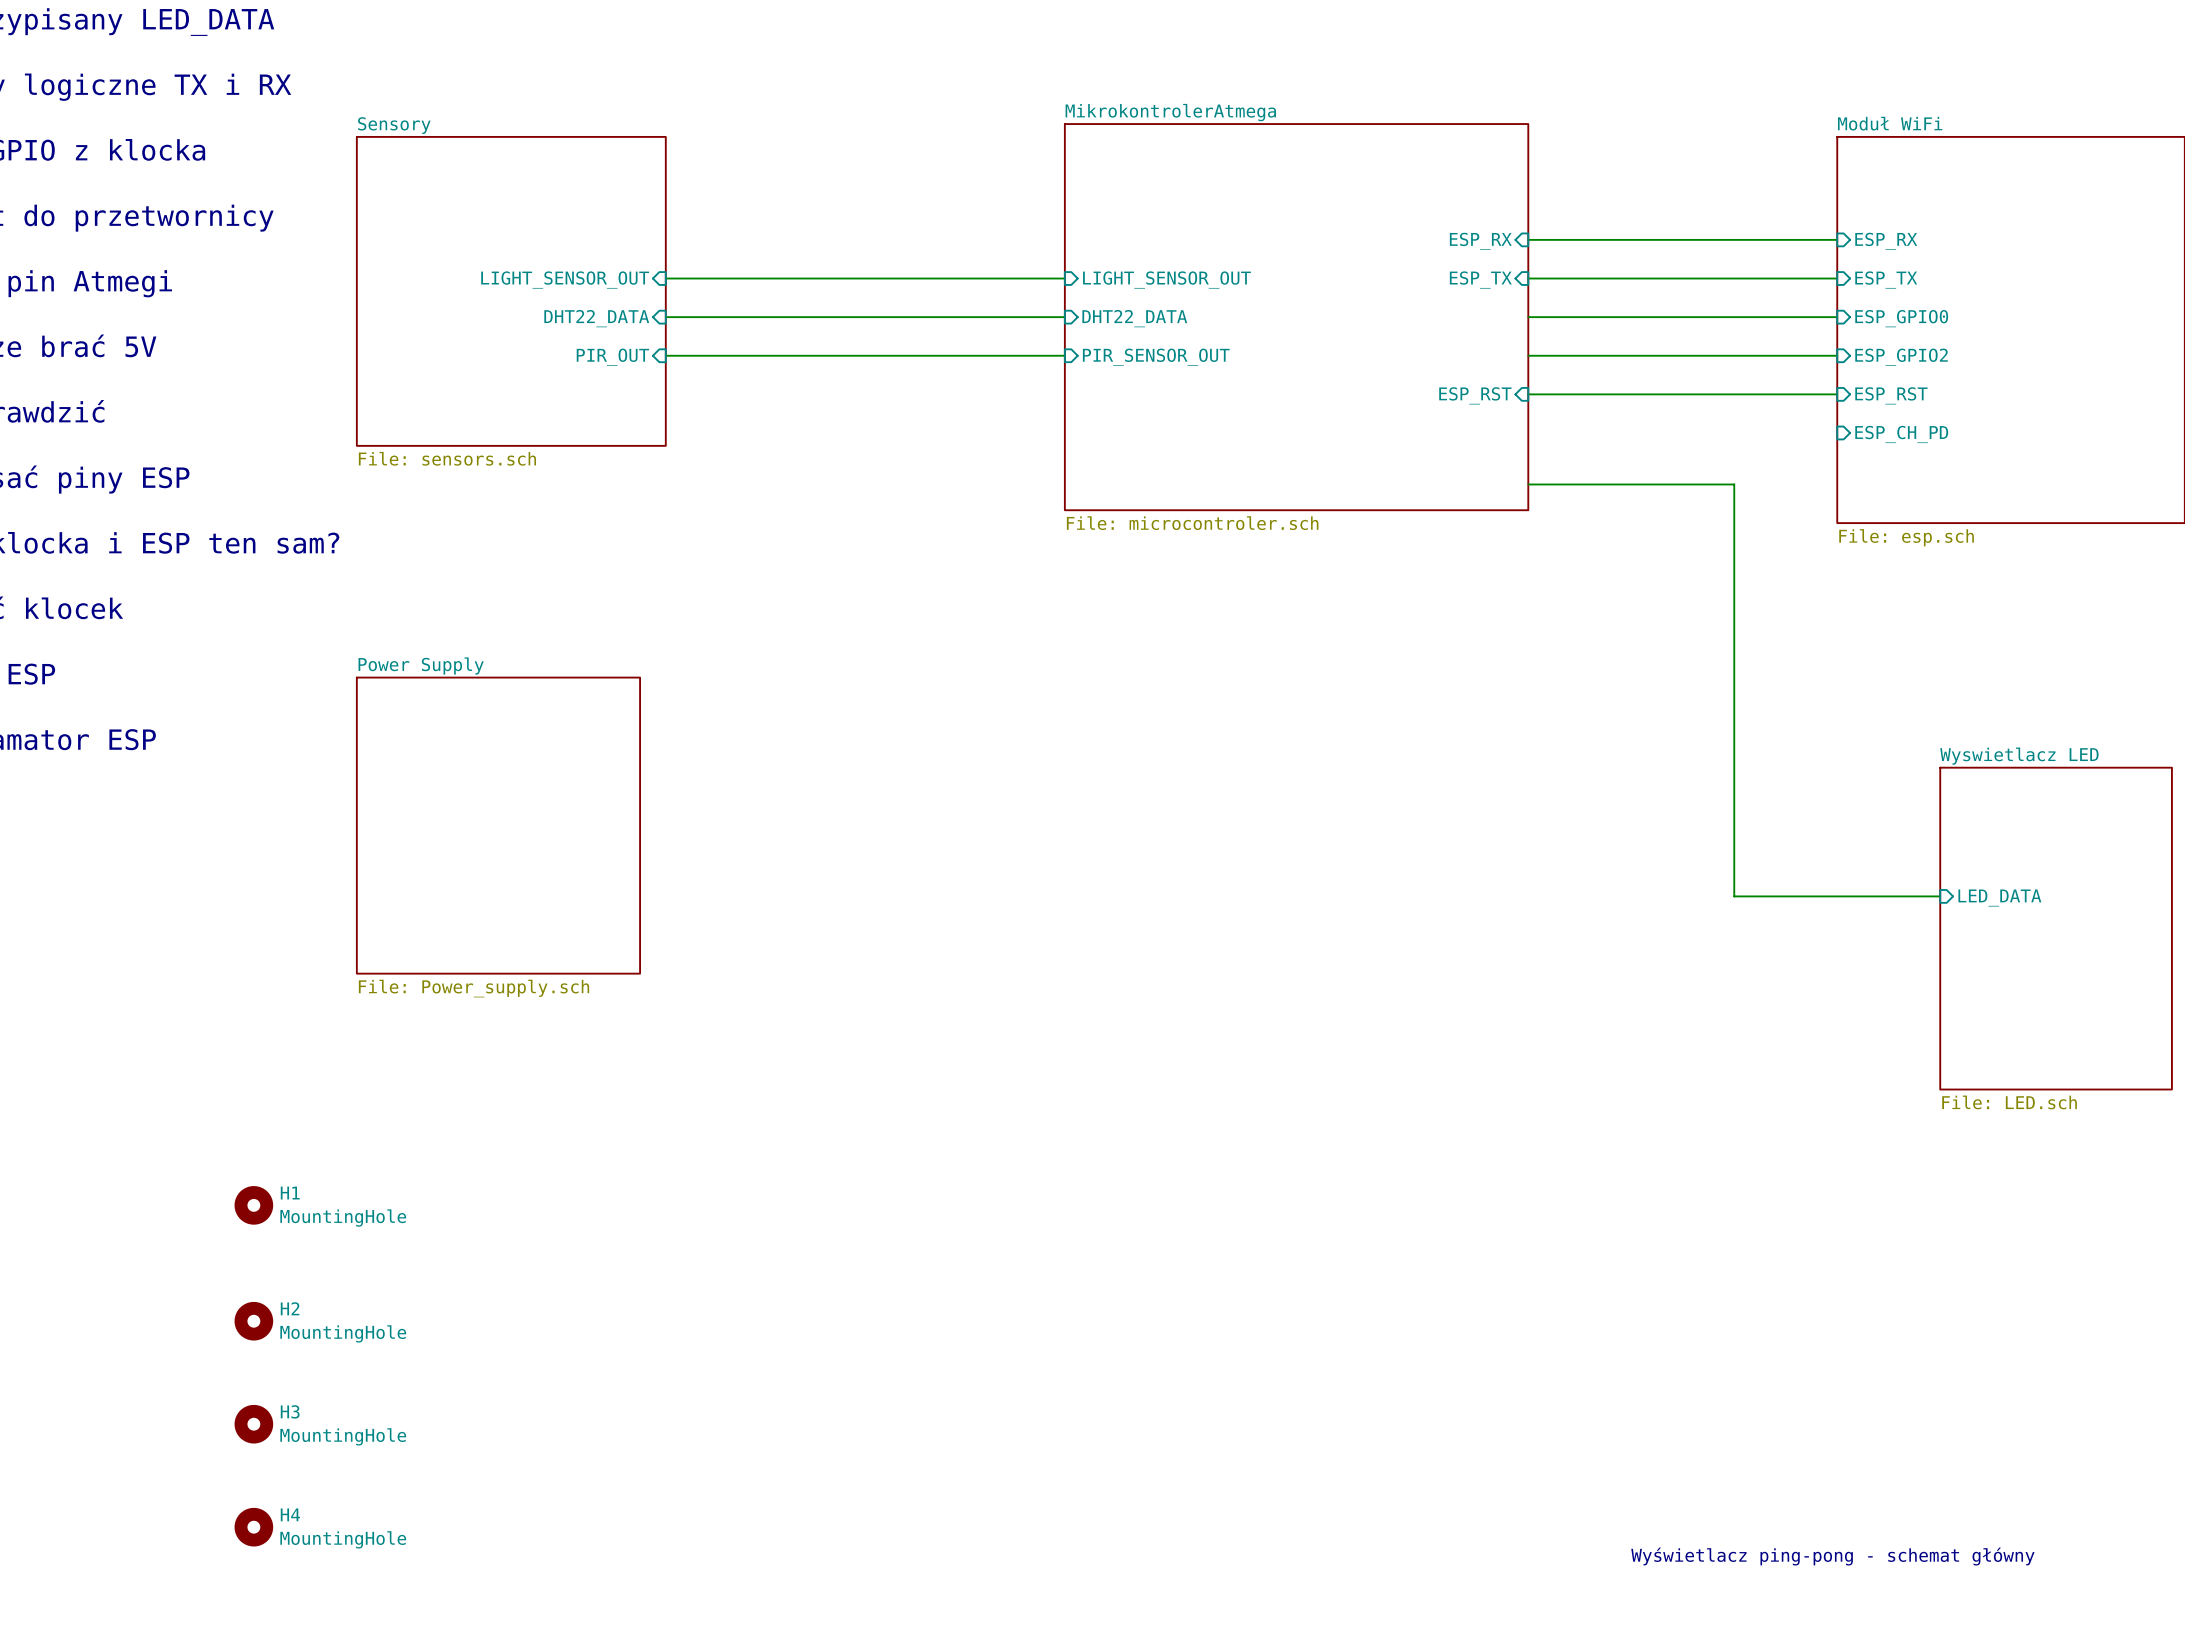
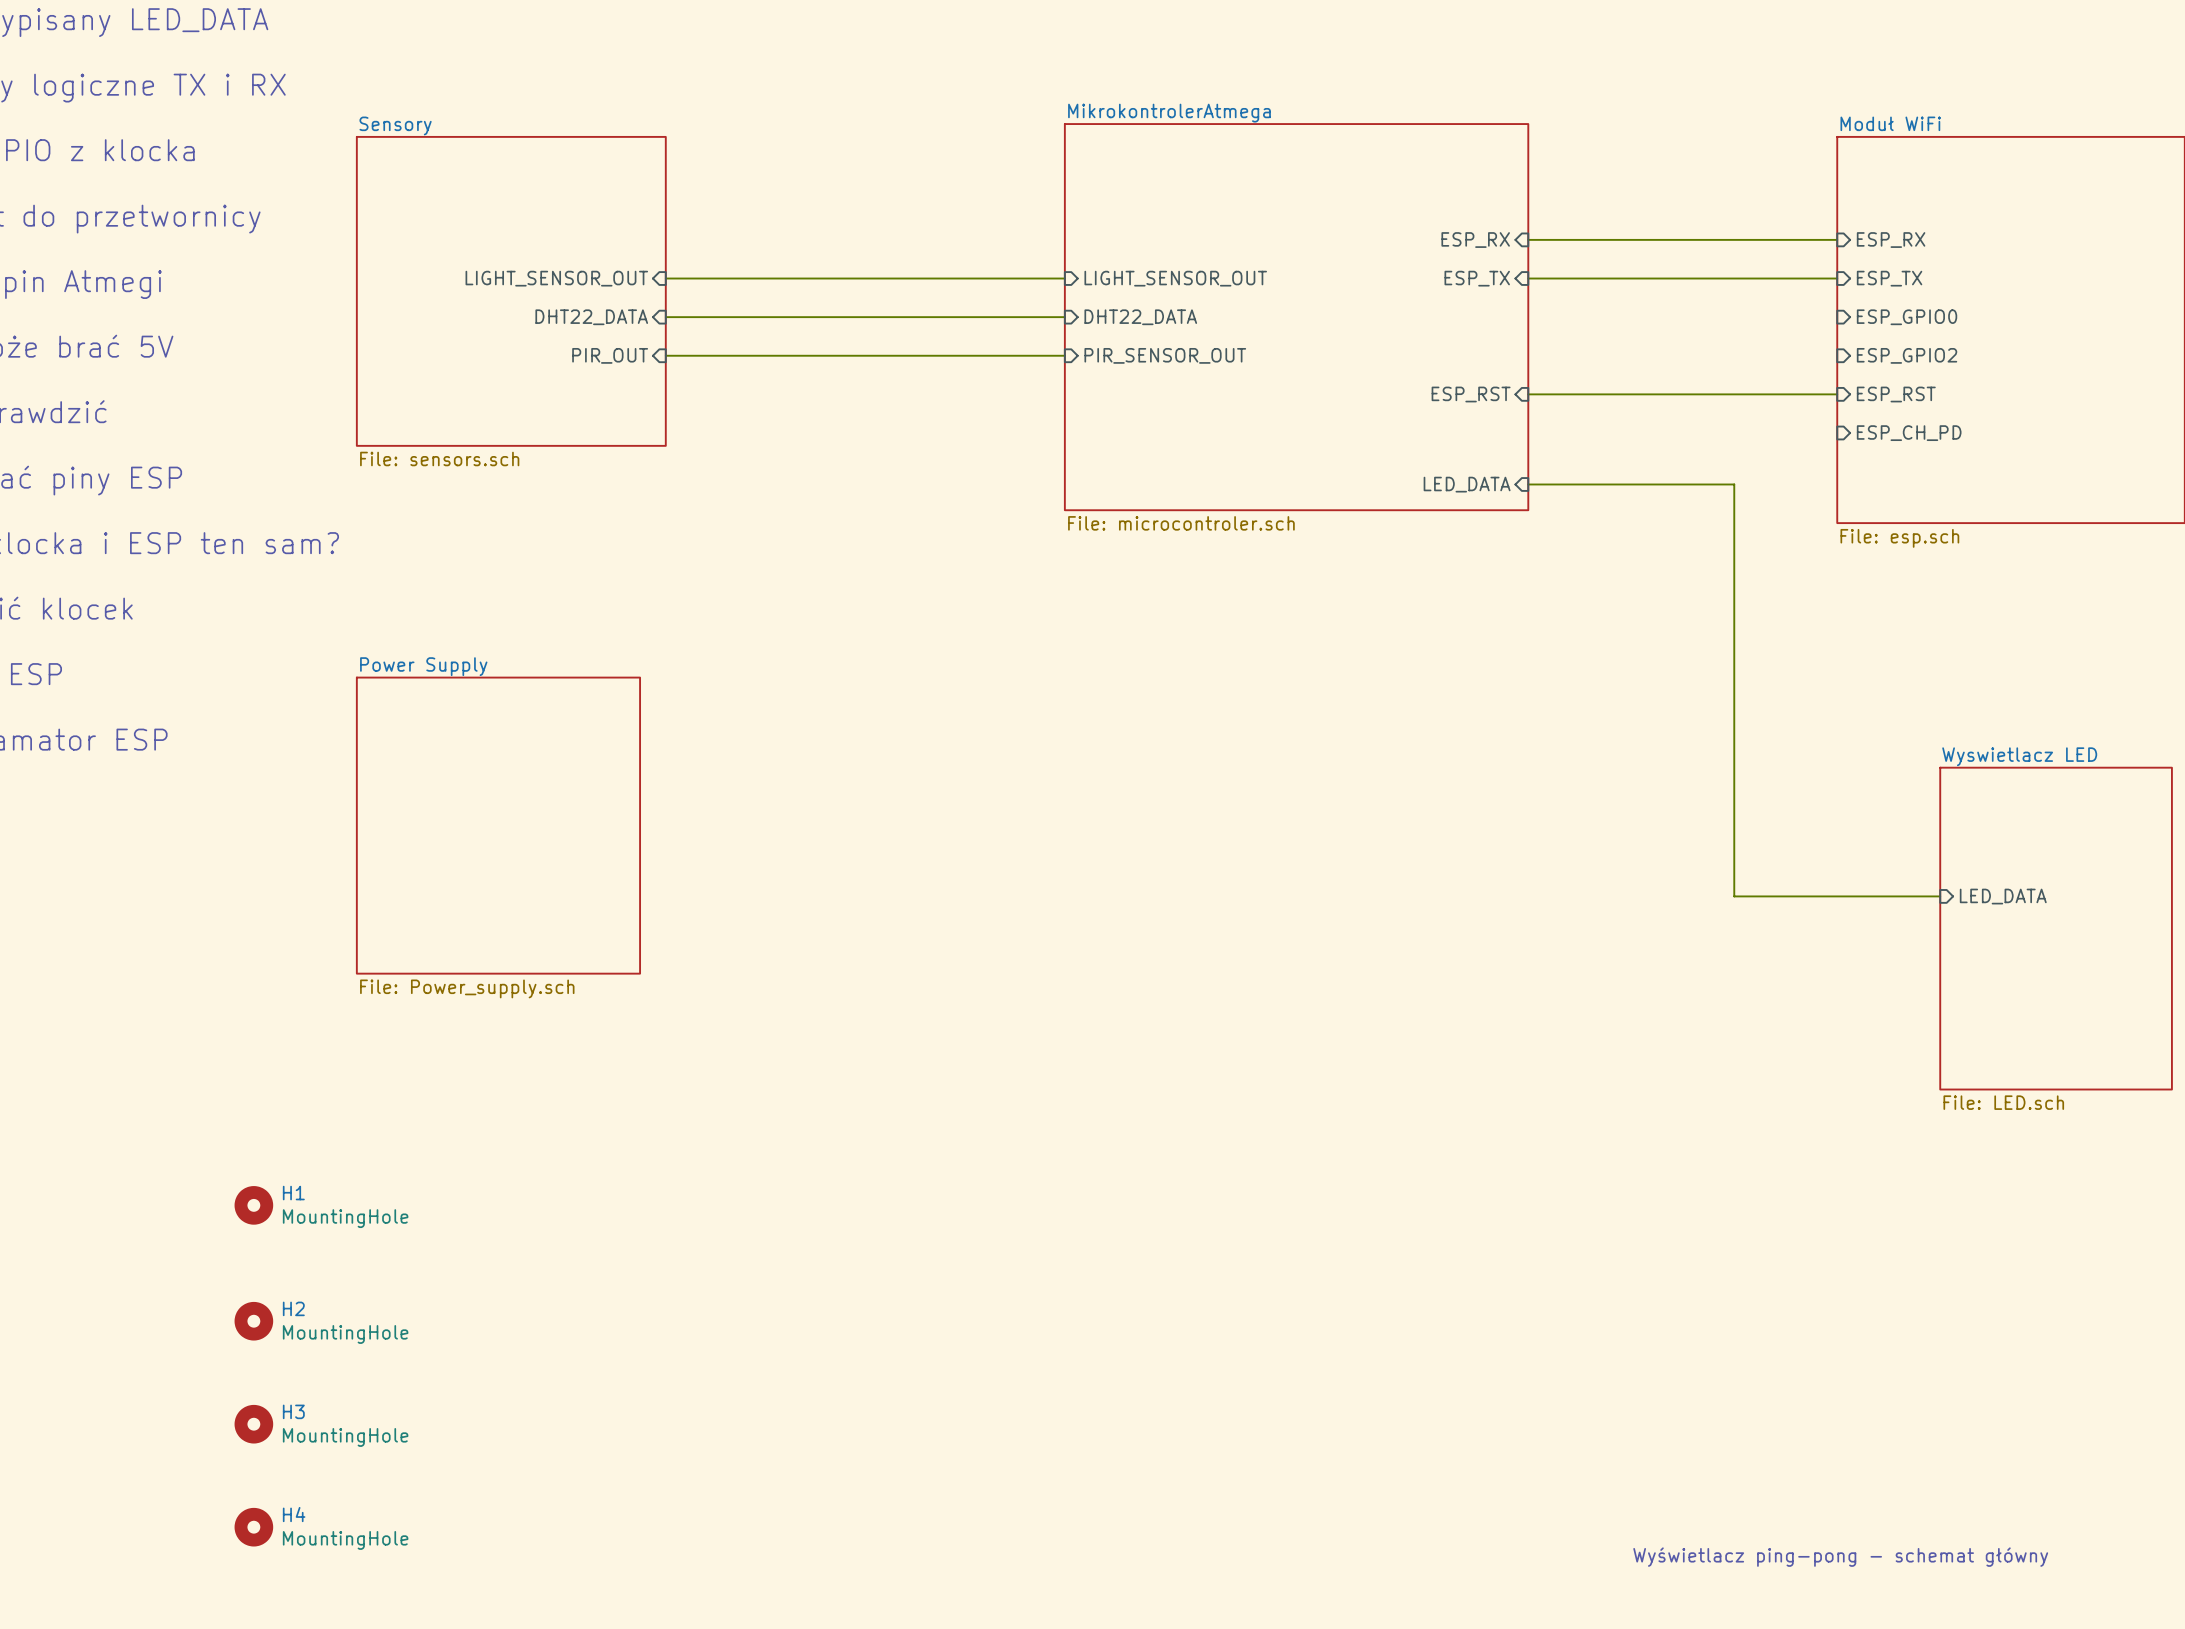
wire: (1528, 317) (1837, 317) -> none
wire: (1528, 355) (1837, 355) -> none
sheet pin: none -> LED_DATA (1467, 484)

